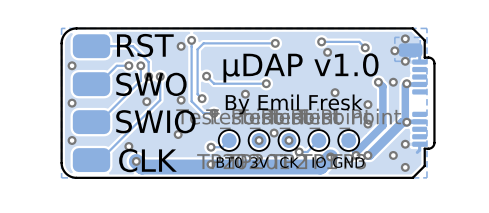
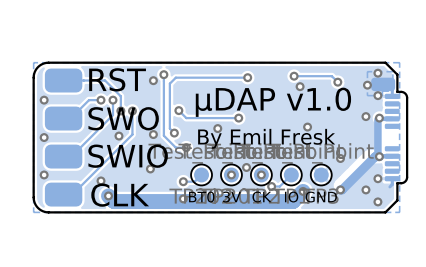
track: (378, 82) (382, 86) (382, 125) (356, 152) (356, 155) -> none
via: (378, 82) -> none
via: (367, 104) -> none
via: (356, 155) -> none

